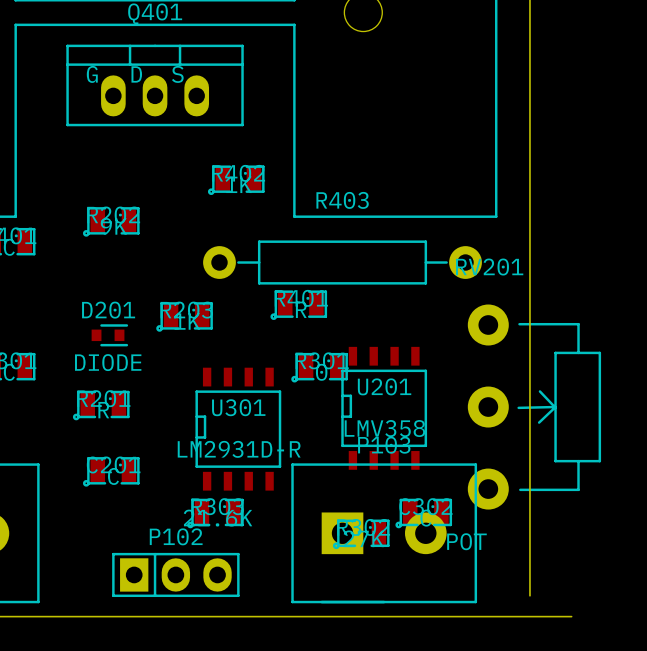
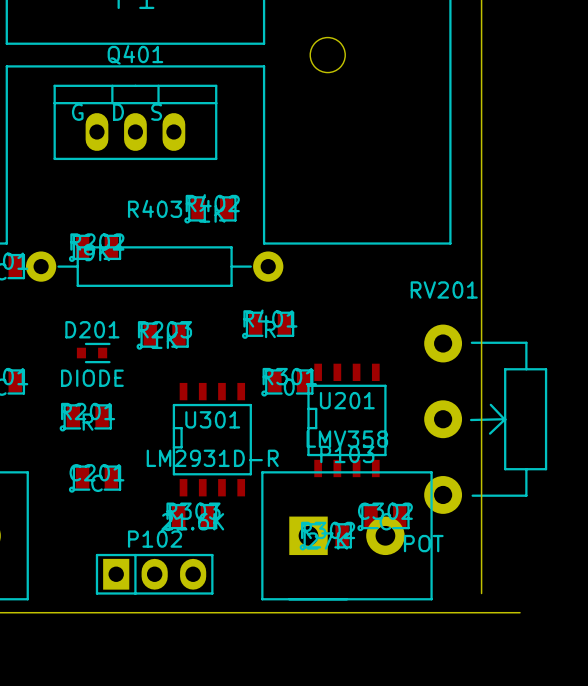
R403 position: (342, 262) -> (154, 266)

